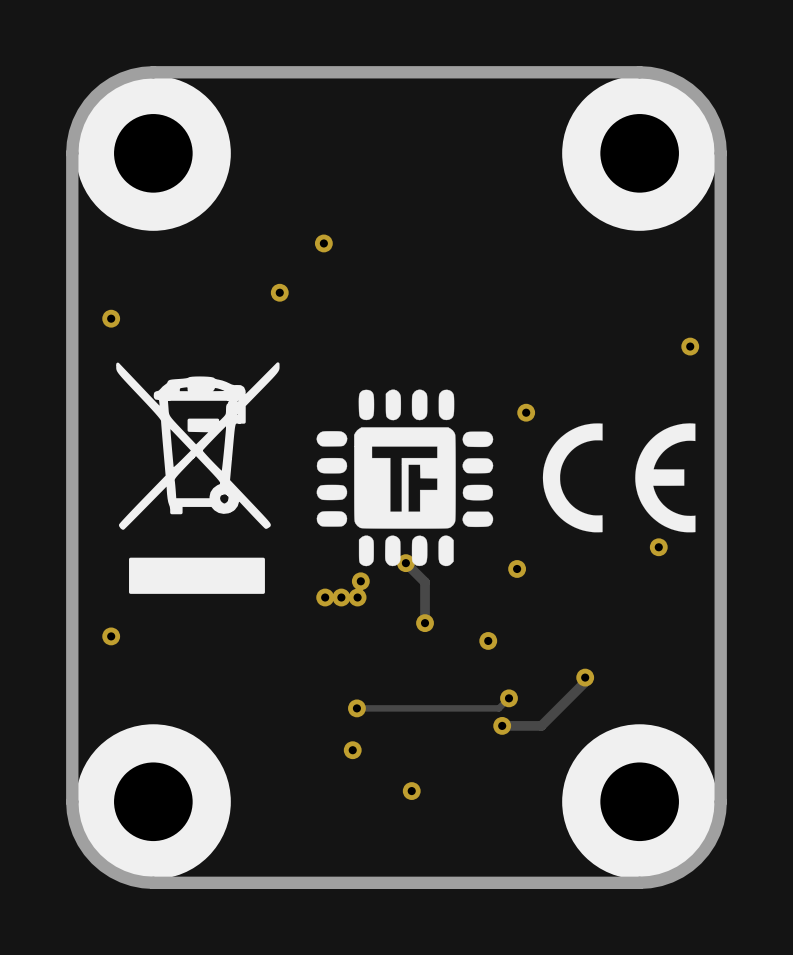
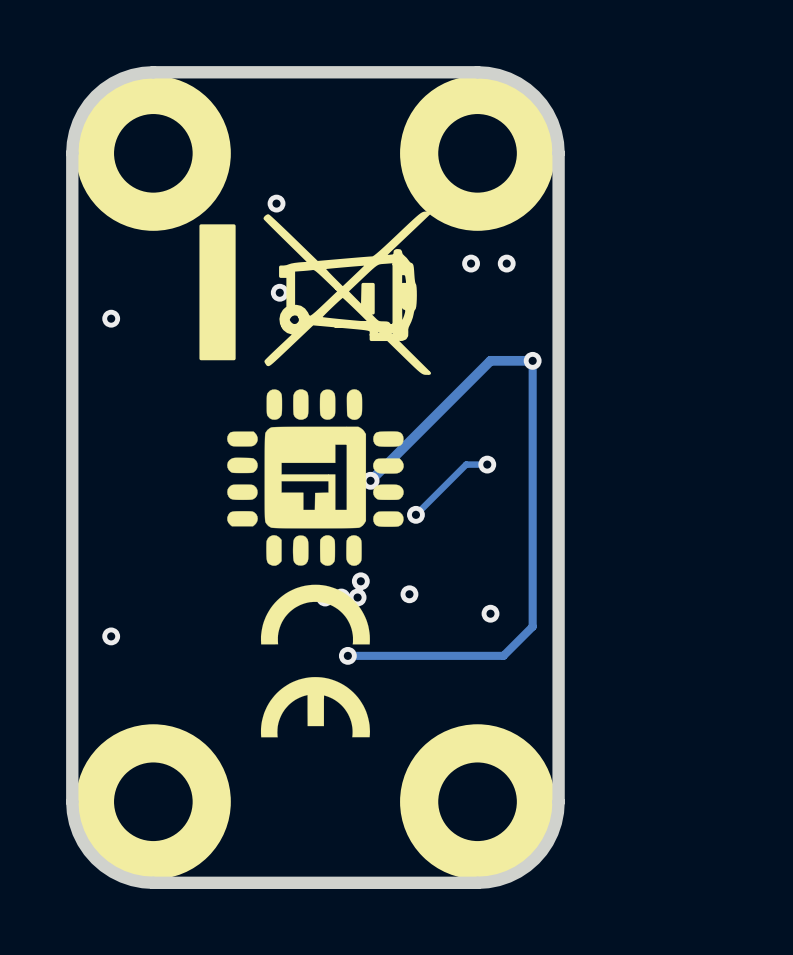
board edge: (477, 72) (639, 72) (660, 75) (680, 83) (703, 103) (717, 132) (720, 153) (720, 801) (717, 822) (709, 842) (696, 859) (680, 871) (660, 880) (639, 882) (477, 882) -> (477, 72) (508, 78) (534, 96) (552, 122) (558, 153) (557, 812) (547, 842) (534, 859) (508, 876) (477, 882)
part position: (639, 153) -> (477, 153)
drawing: none -> [199, 211, 431, 738]
via position: (323, 243) -> (276, 203)
via: none -> (471, 263)
via: none -> (506, 263)
via: (690, 346) -> none
via: none -> (532, 360)
drawing: [116, 362, 494, 594] -> none
via: (526, 412) -> none
drawing: [542, 423, 696, 533] -> none
track: none -> (487, 464) (466, 464) (415, 514)
via: none -> (487, 464)
track: none -> (370, 480) (490, 360) (532, 360) (532, 626) (503, 655) (347, 655)
via: none -> (370, 480)
via: none -> (415, 514)
via: (658, 547) -> none
track: (405, 563) (425, 582) (425, 623) -> none
via: (405, 563) -> none
via: (517, 568) -> none
via: none -> (409, 594)
via: none -> (490, 613)
via: (425, 623) -> none
via: (488, 640) -> none
via: none -> (347, 655)
track: (585, 677) (585, 682) (541, 725) (502, 725) -> none
via: (585, 677) -> none
track: (509, 698) (498, 708) (356, 708) -> none
via: (509, 698) -> none
via: (356, 708) -> none
via: (502, 725) -> none
via: (352, 750) -> none
via: (411, 791) -> none
part position: (639, 801) -> (477, 801)

